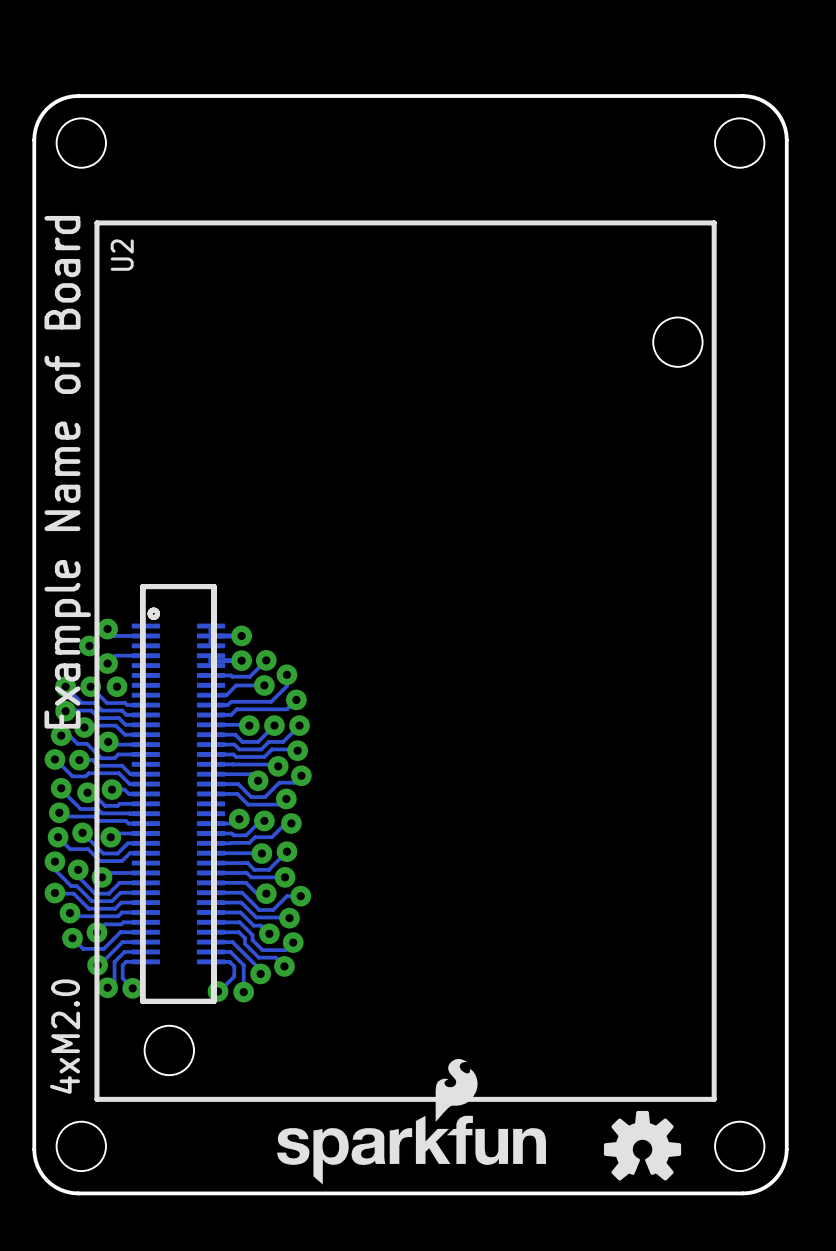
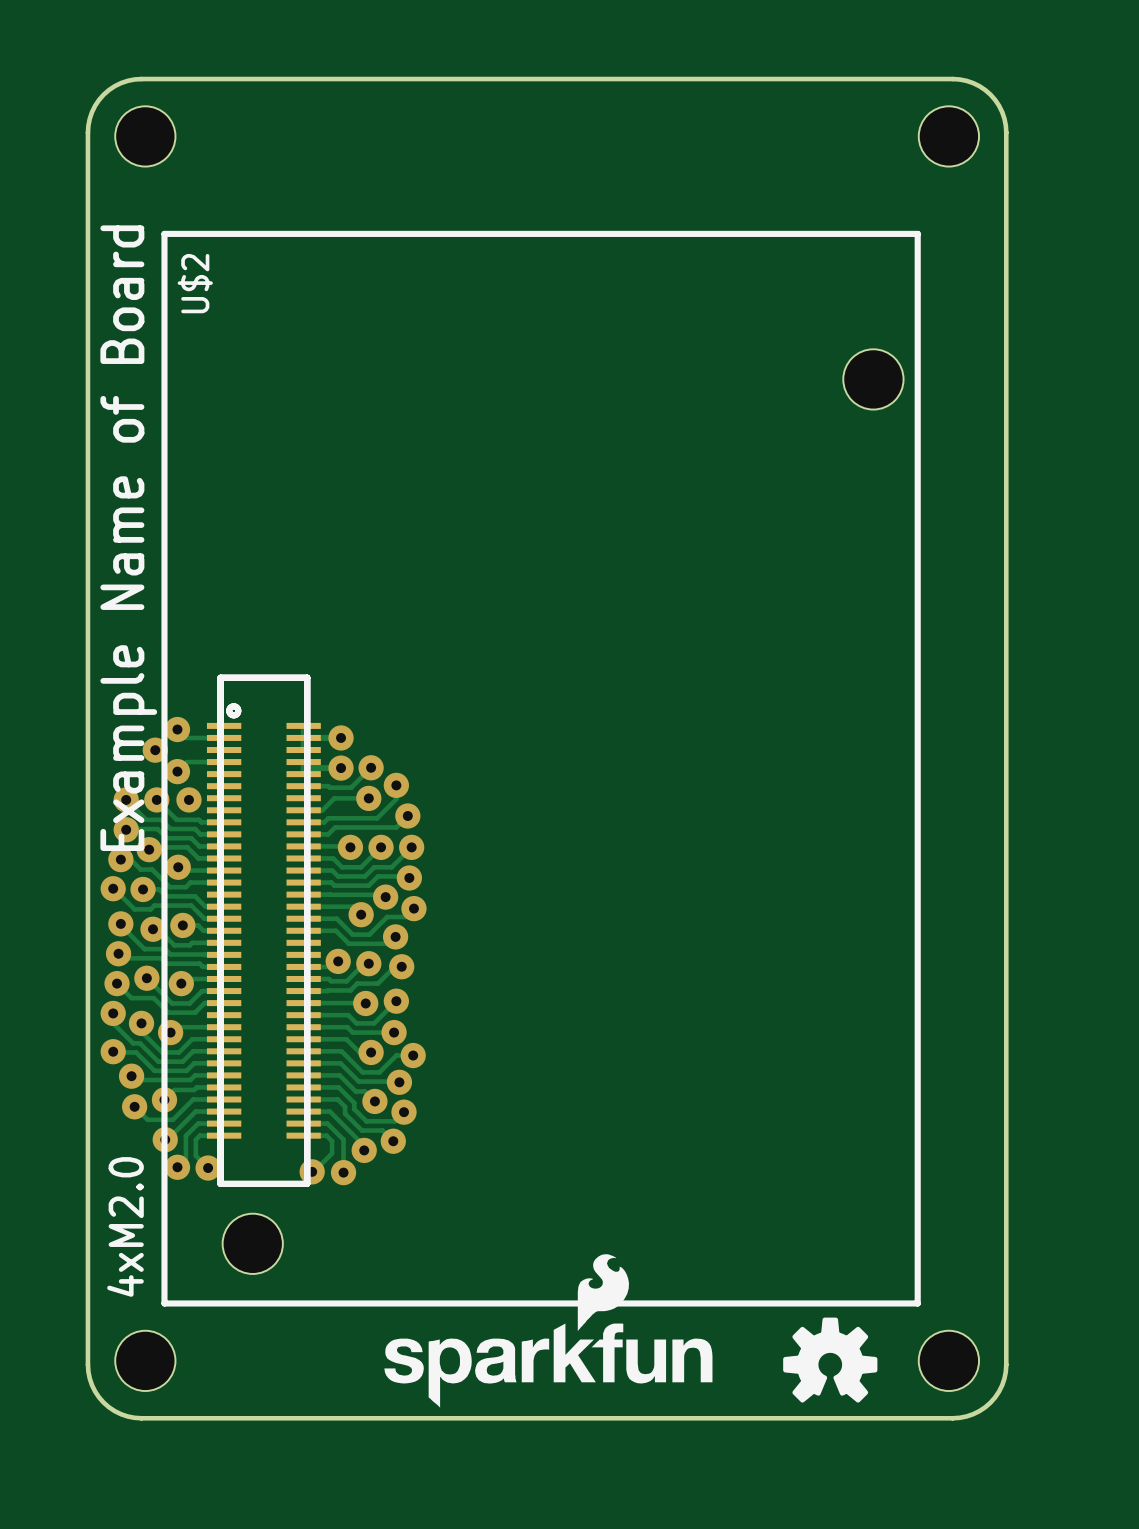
U2 name: U2 (122, 255) -> U$2 (195, 283)

